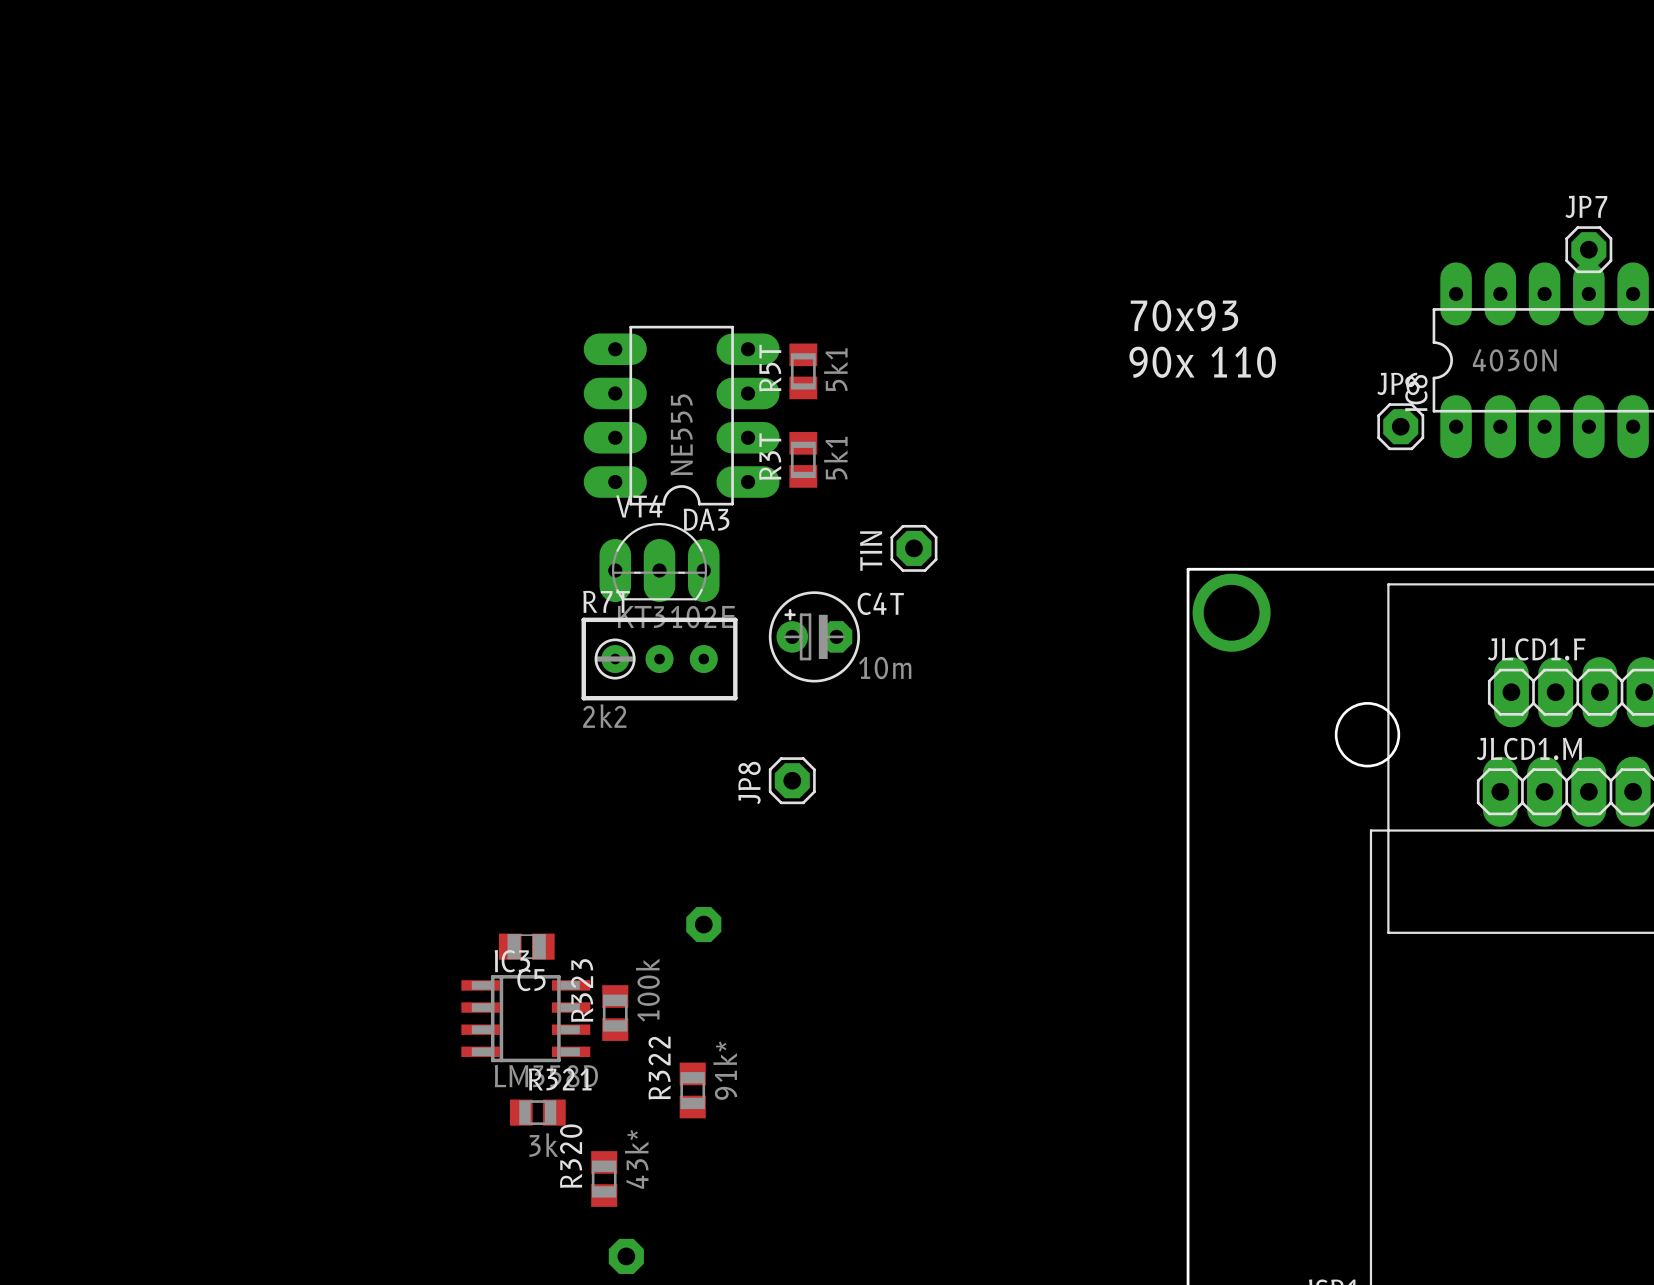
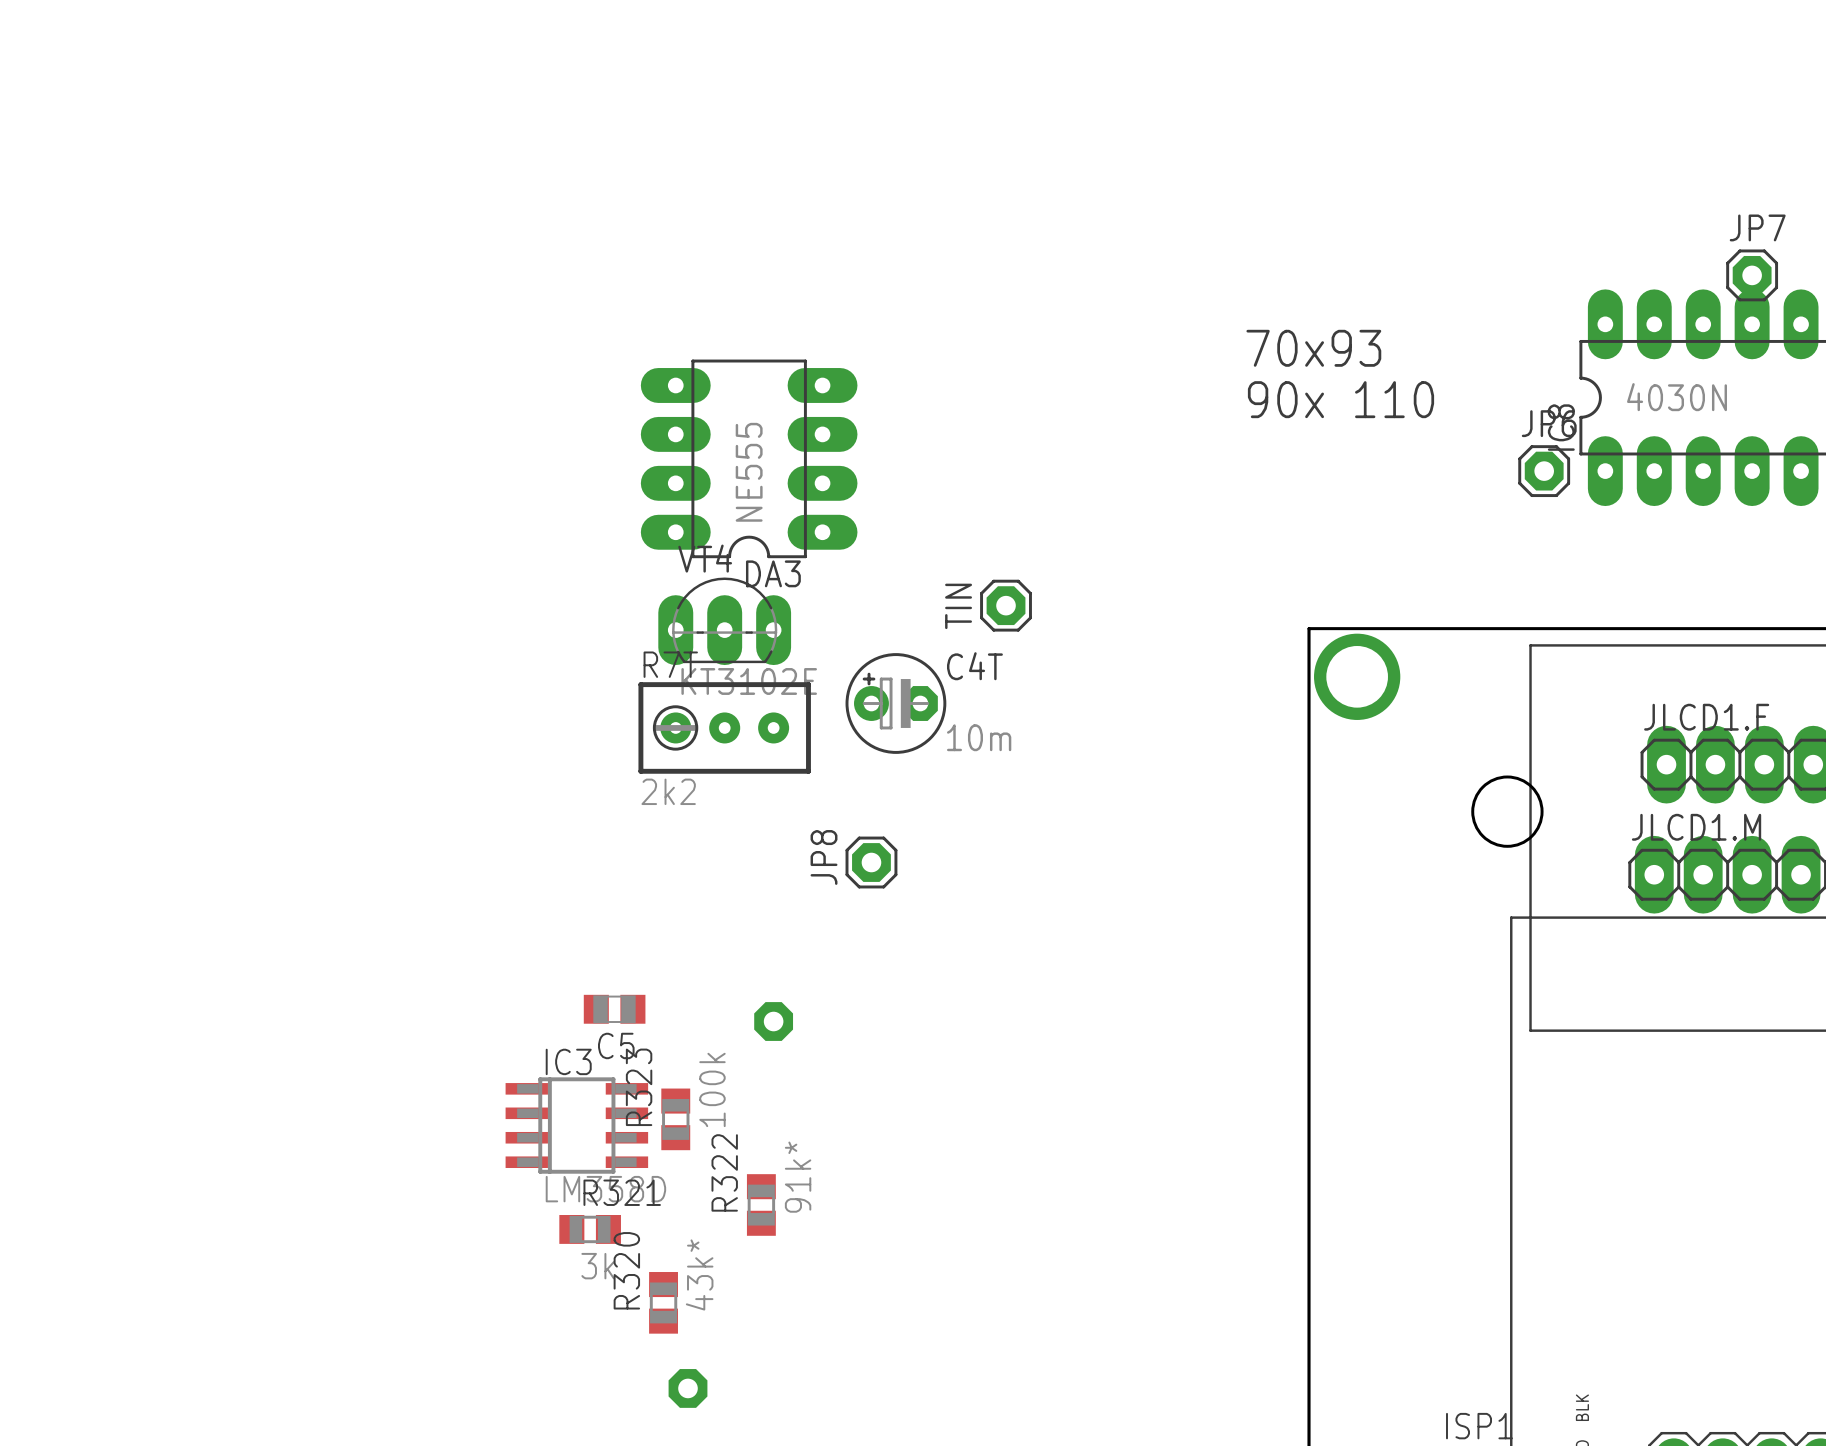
R5T: 5k1 (803, 371) -> none
R3T: 5k1 (803, 459) -> none
C5 position: (526, 946) -> (614, 1009)

